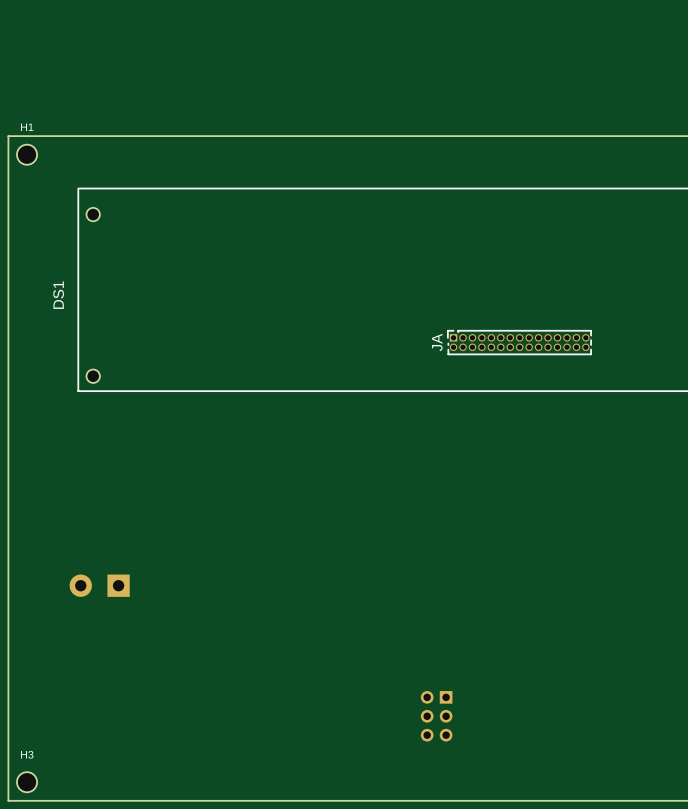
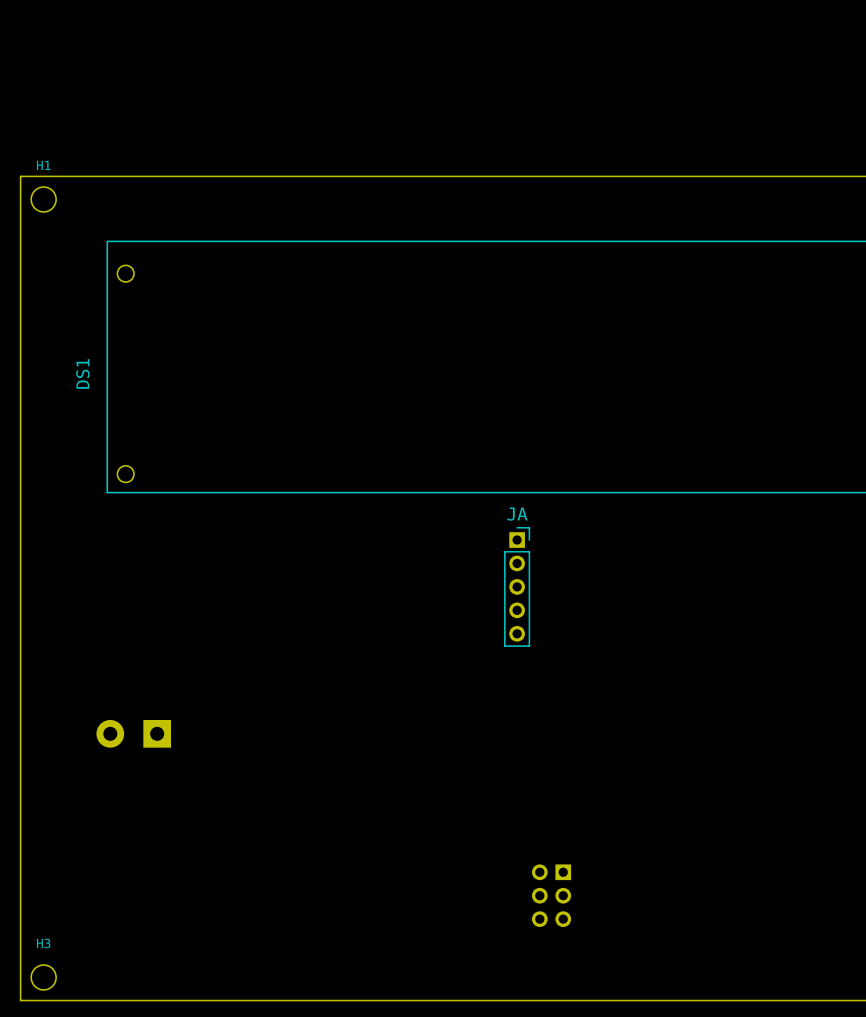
JA: (519, 342) -> none
JA: none -> (517, 586)

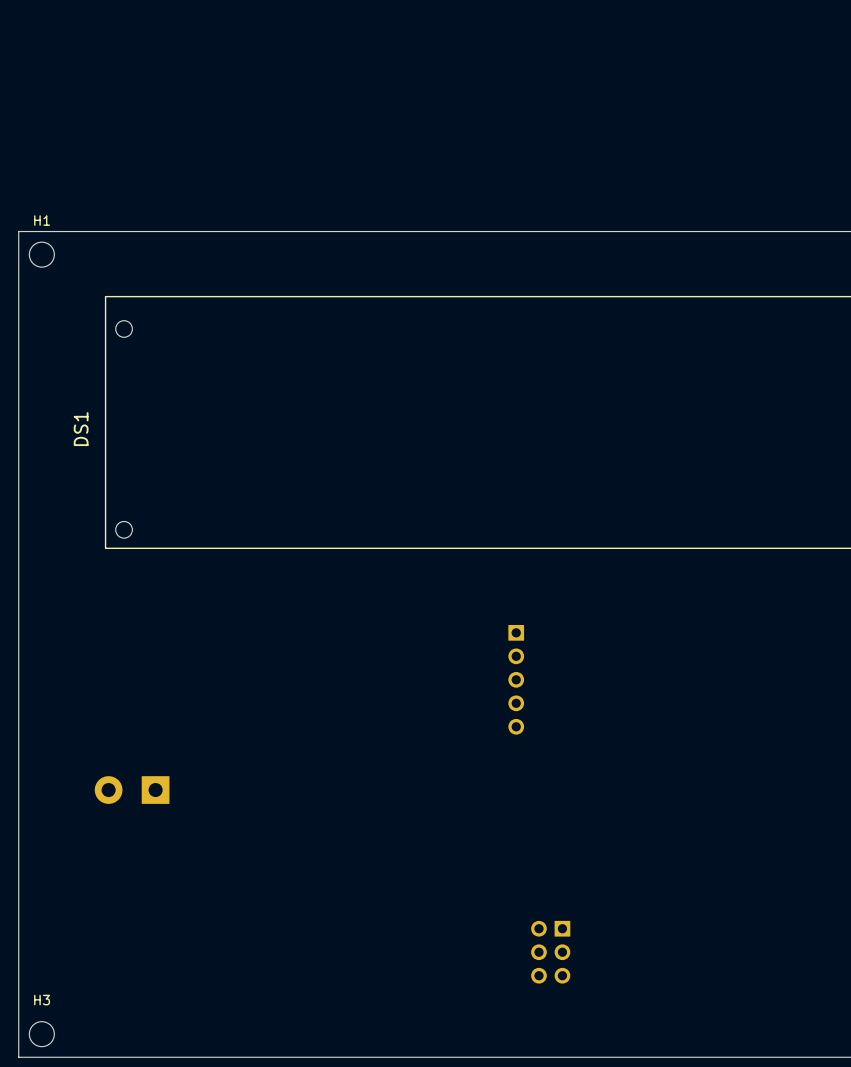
JA: (517, 586) -> none
part: none -> (516, 679)

